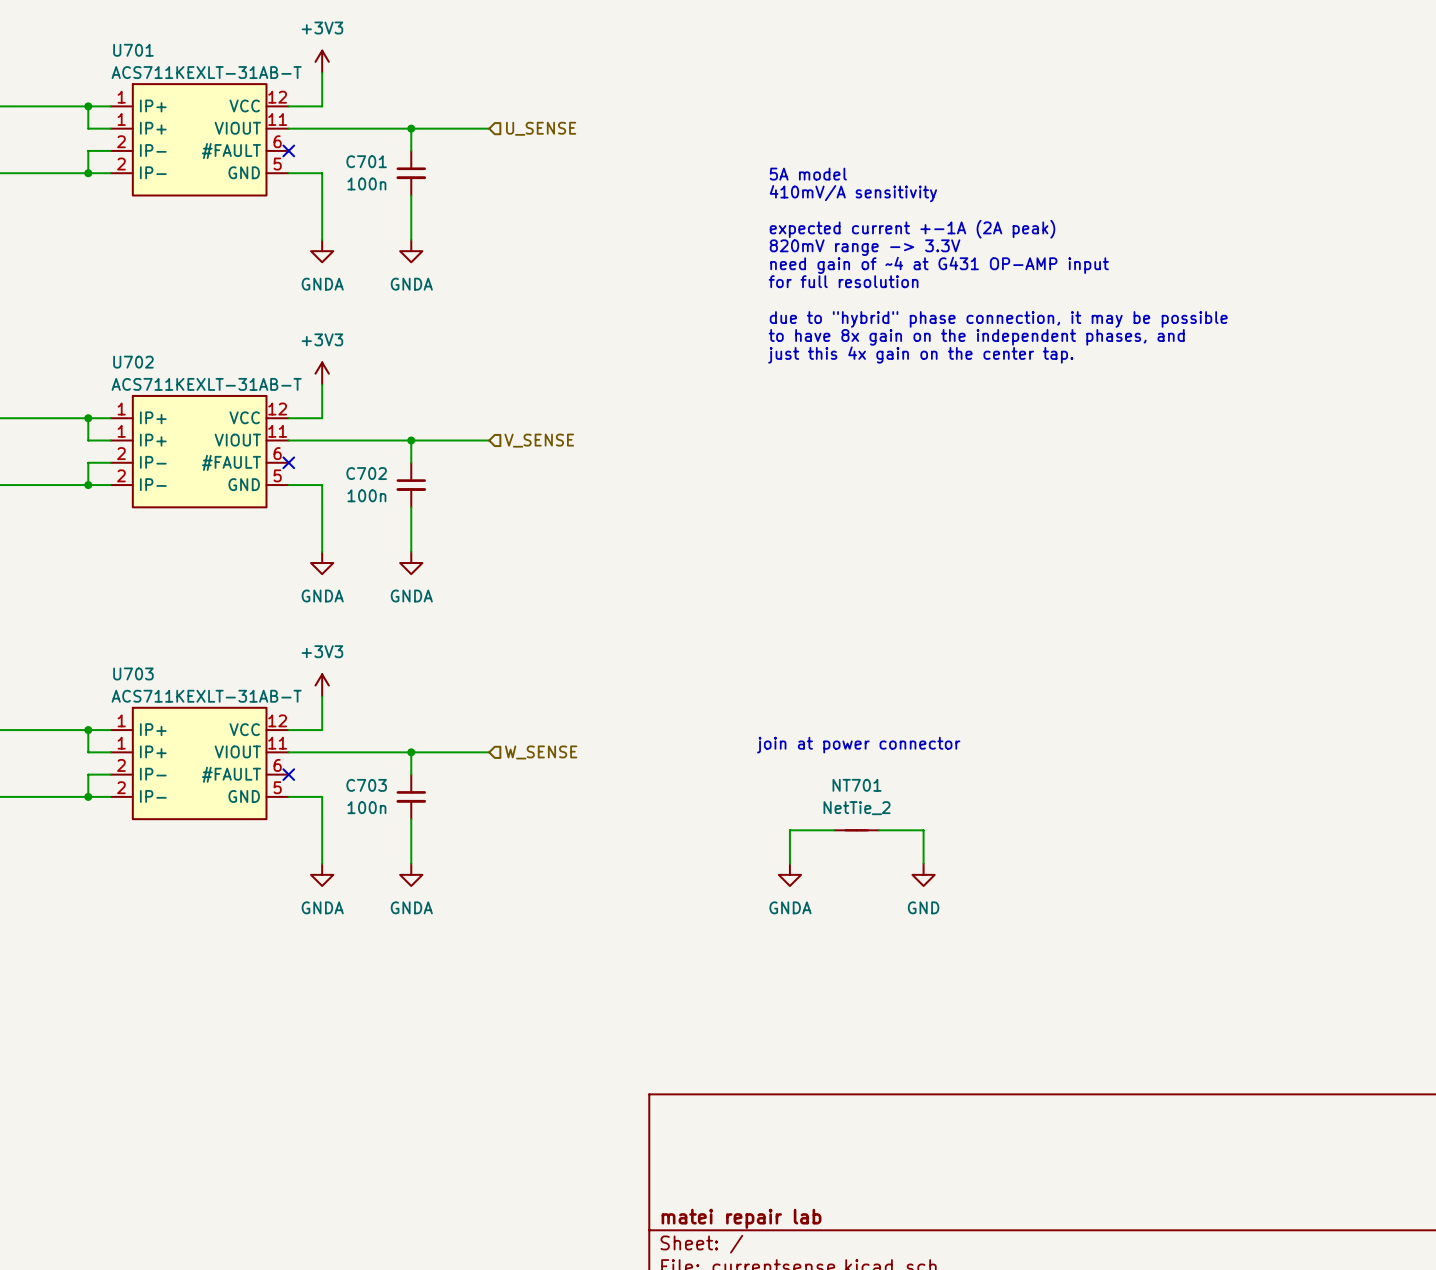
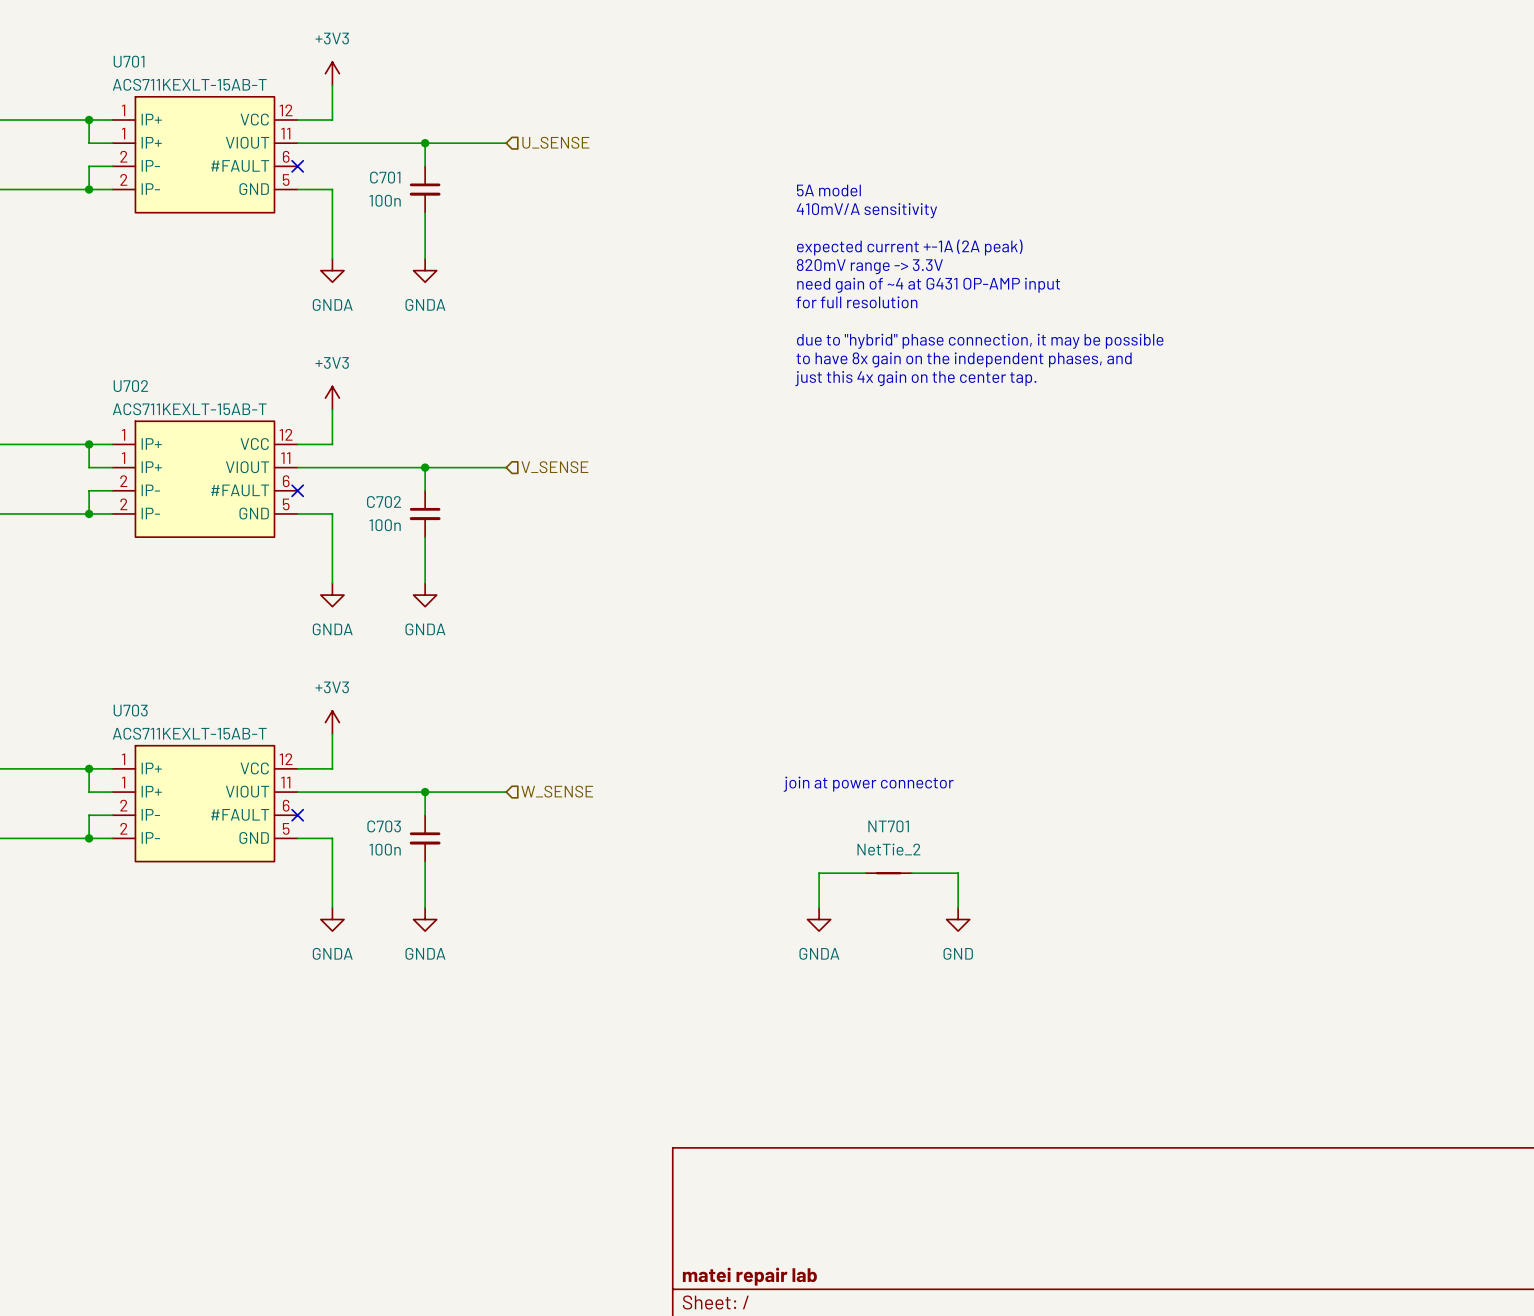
U701 value: ACS711KEXLT-31AB-T (206, 72) -> ACS711KEXLT-15AB-T (189, 84)
U702 value: ACS711KEXLT-31AB-T (206, 384) -> ACS711KEXLT-15AB-T (189, 409)
U703 value: ACS711KEXLT-31AB-T (206, 696) -> ACS711KEXLT-15AB-T (189, 733)

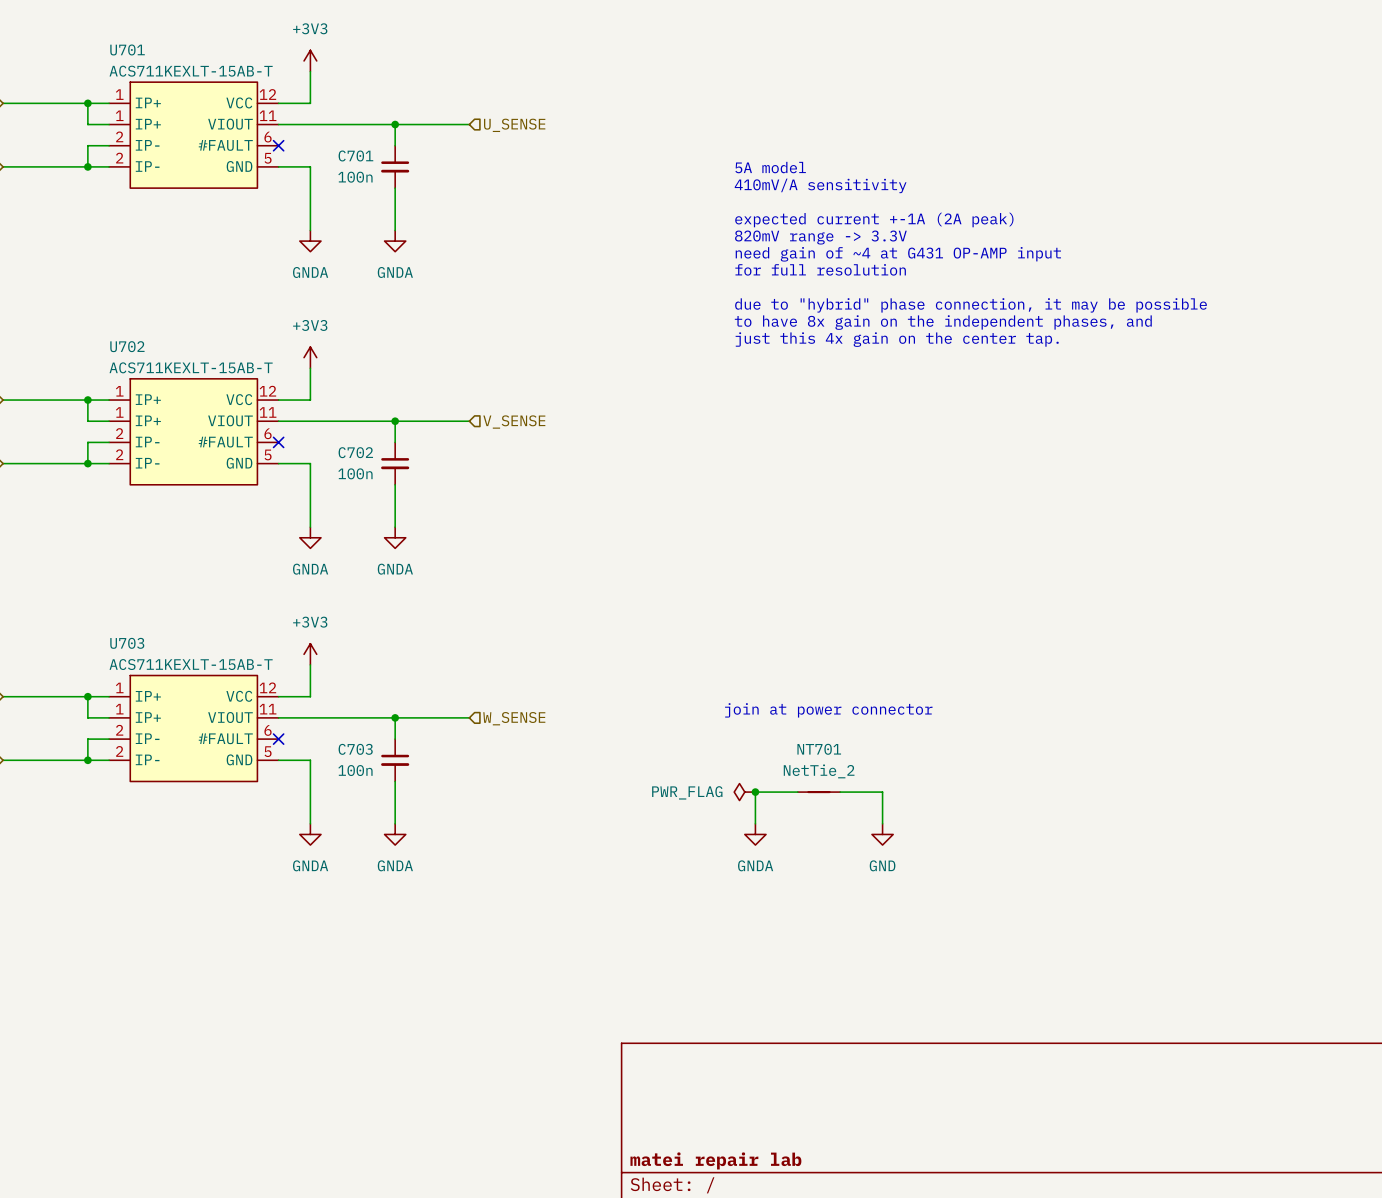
power symbol: none -> PWR_FLAG (744, 792)
junction: none -> (755, 792)

